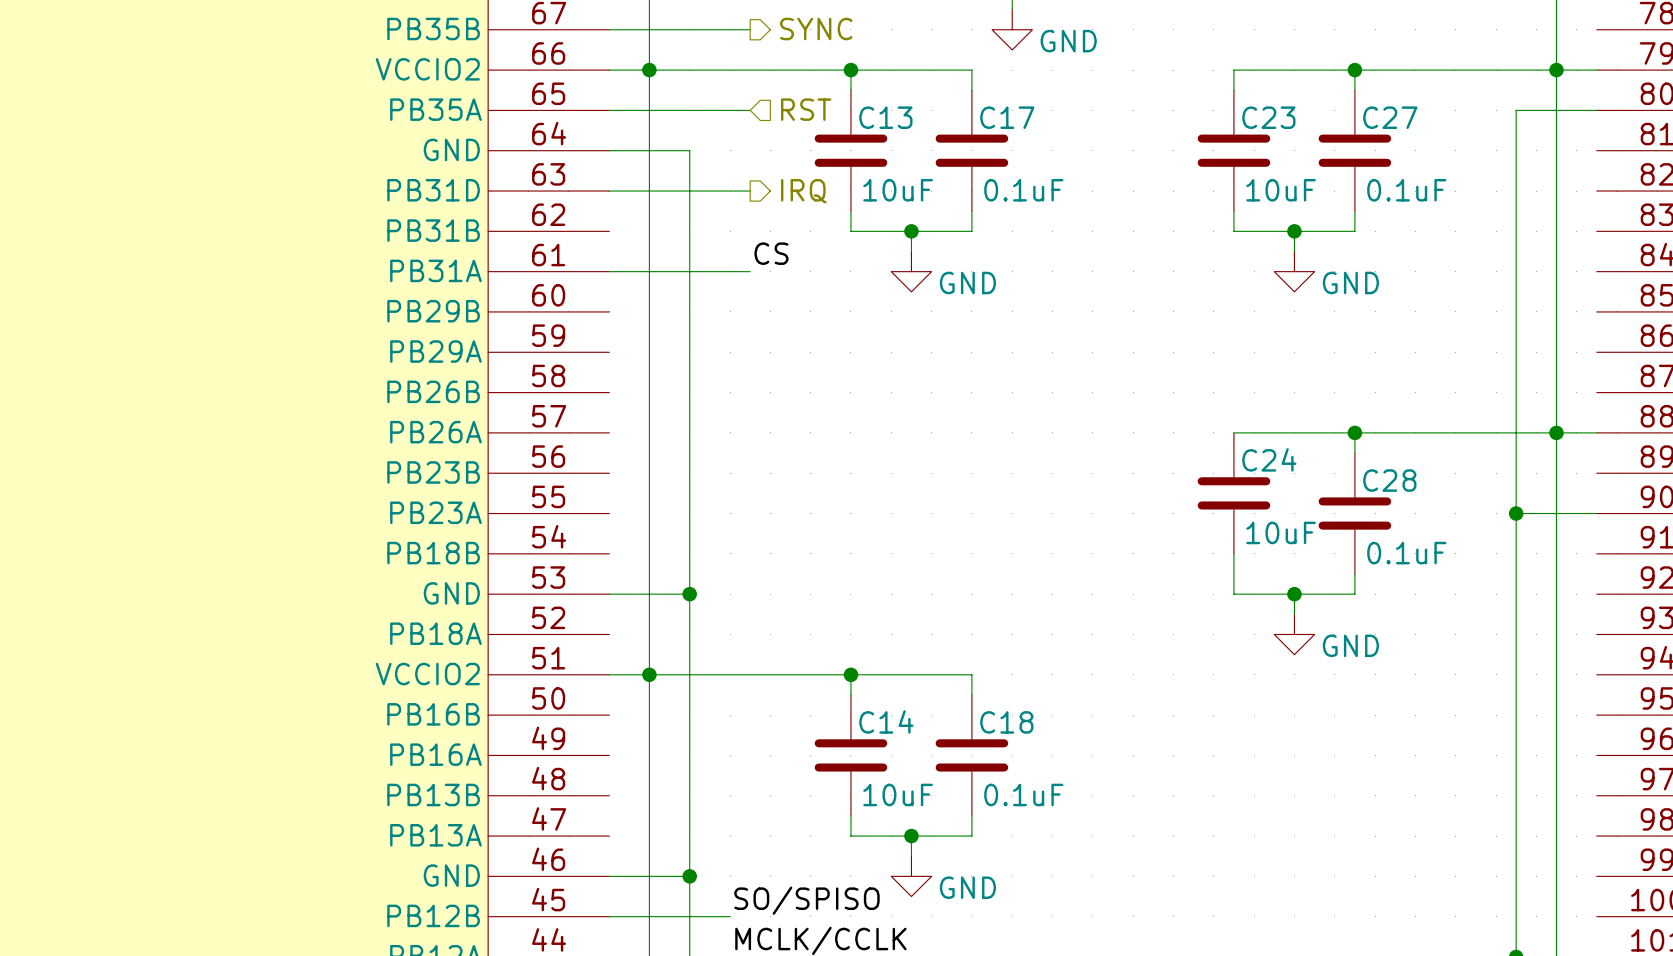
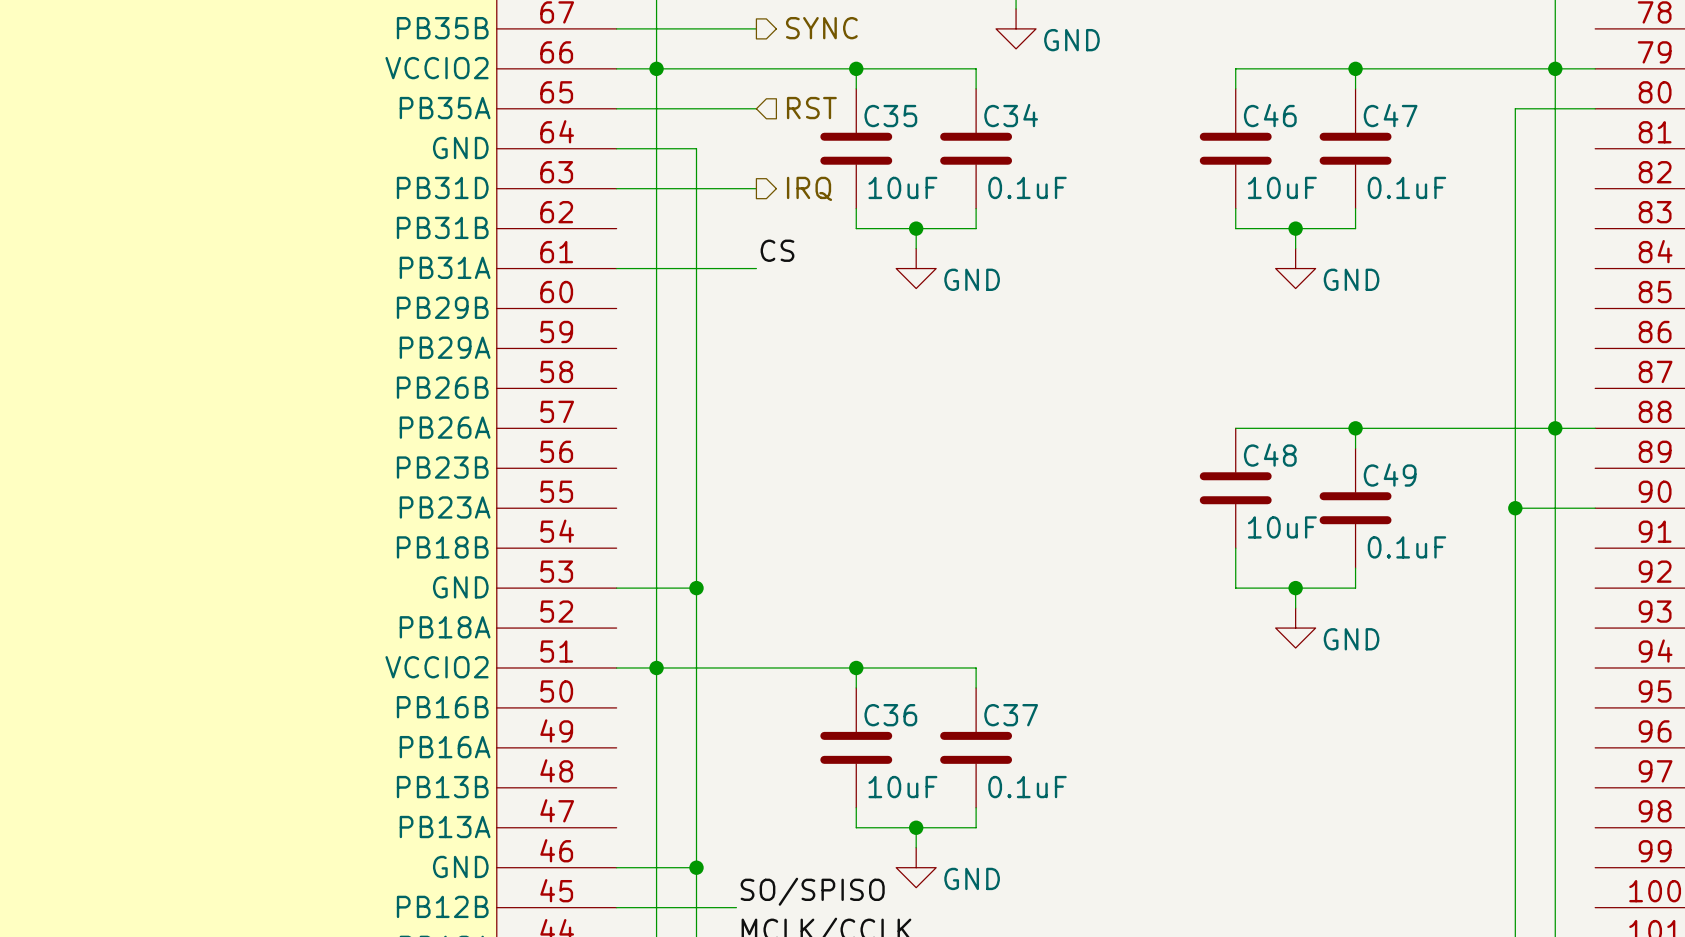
C13 name: C13 (885, 117) -> C35 (890, 116)
C17 name: C17 (1007, 117) -> C34 (1011, 115)
C23 name: C23 (1268, 117) -> C46 (1270, 115)
C27 name: C27 (1390, 117) -> C47 (1390, 115)
C24 name: C24 (1269, 459) -> C48 (1270, 455)
C28 name: C28 (1389, 480) -> C49 (1390, 475)
C14 name: C14 (886, 721) -> C36 (890, 715)
C18 name: C18 (1006, 722) -> C37 (1011, 715)

